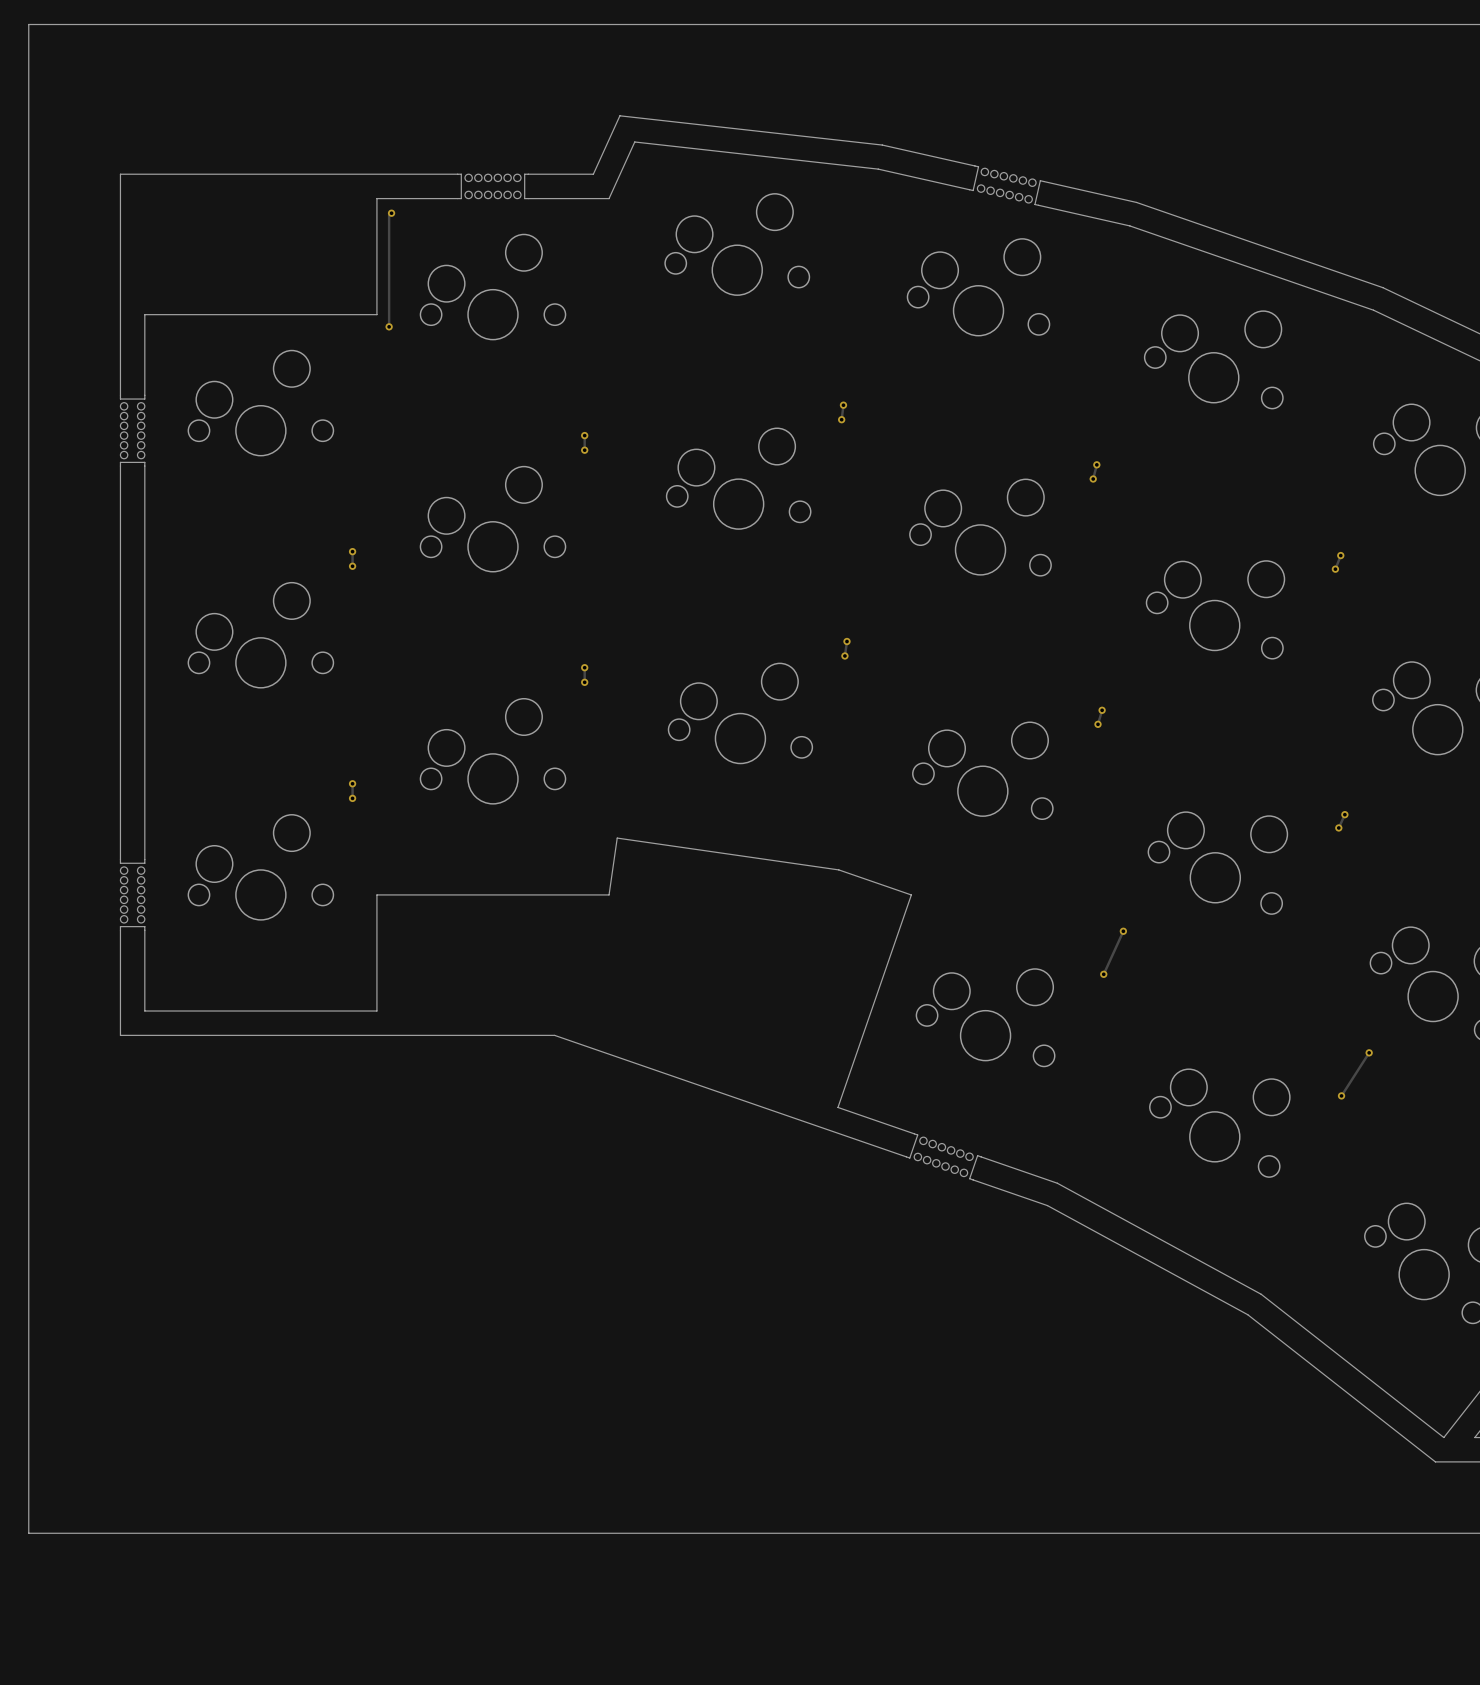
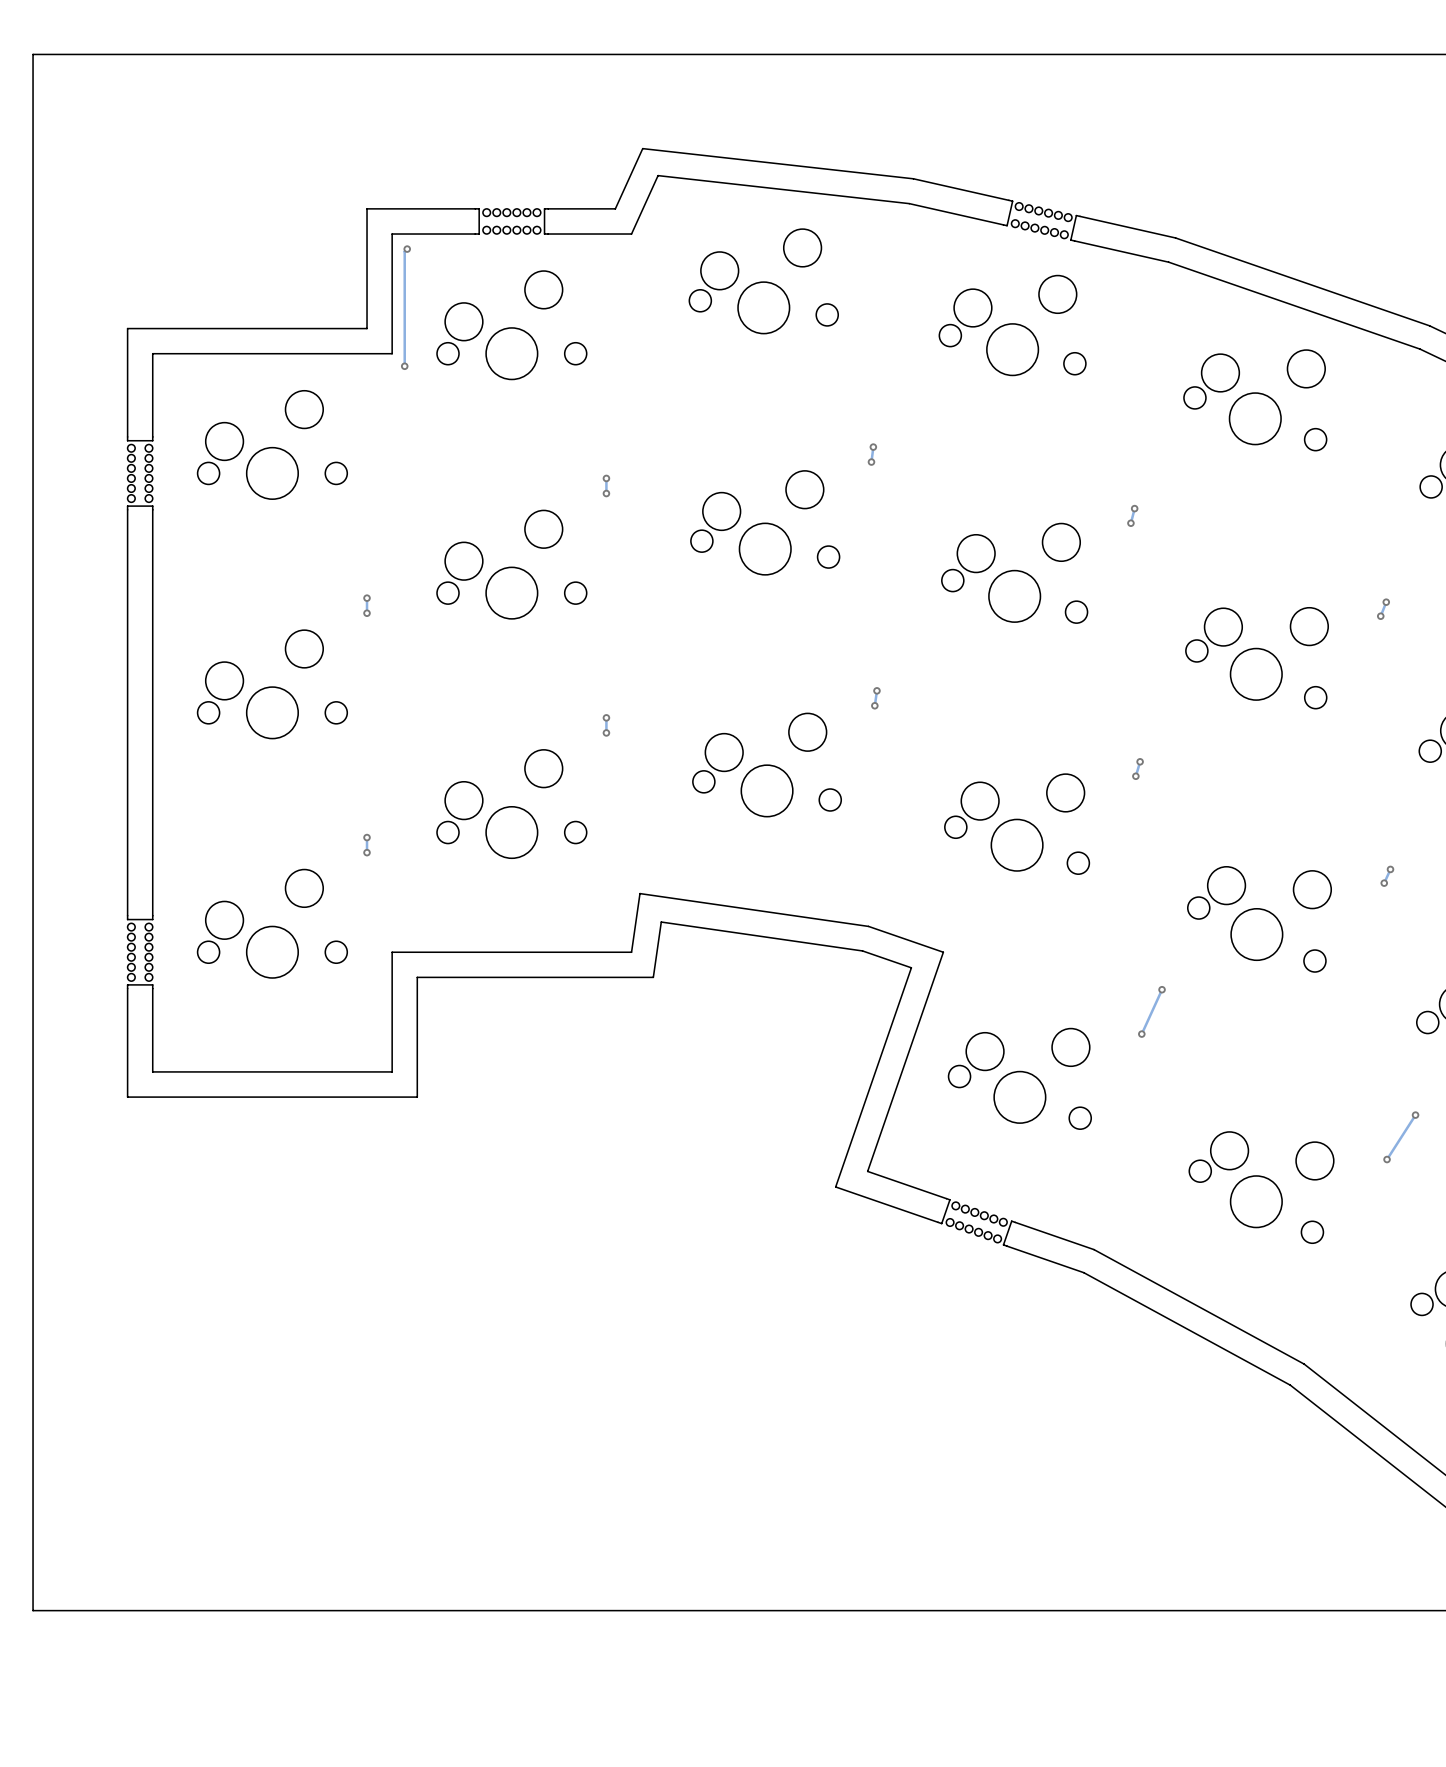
board edge: (352, 174) (120, 174) (120, 290) -> (367, 208) (367, 328) (127, 328)
board edge: (120, 1035) (554, 1035) (806, 1122) -> (127, 1097) (417, 1097) (417, 977) (653, 977) (661, 922) (862, 950) (911, 967) (835, 1186)

